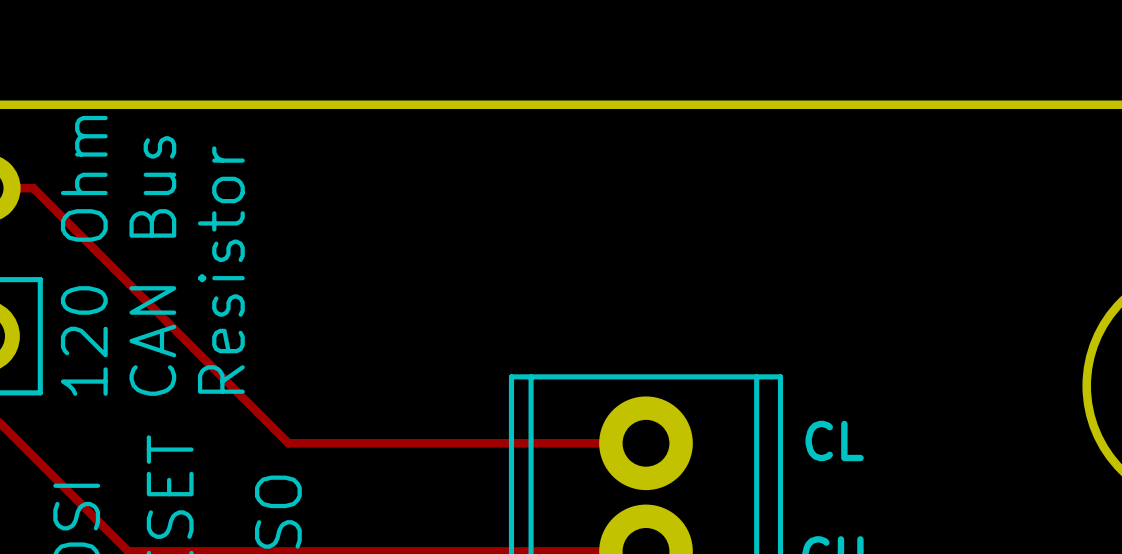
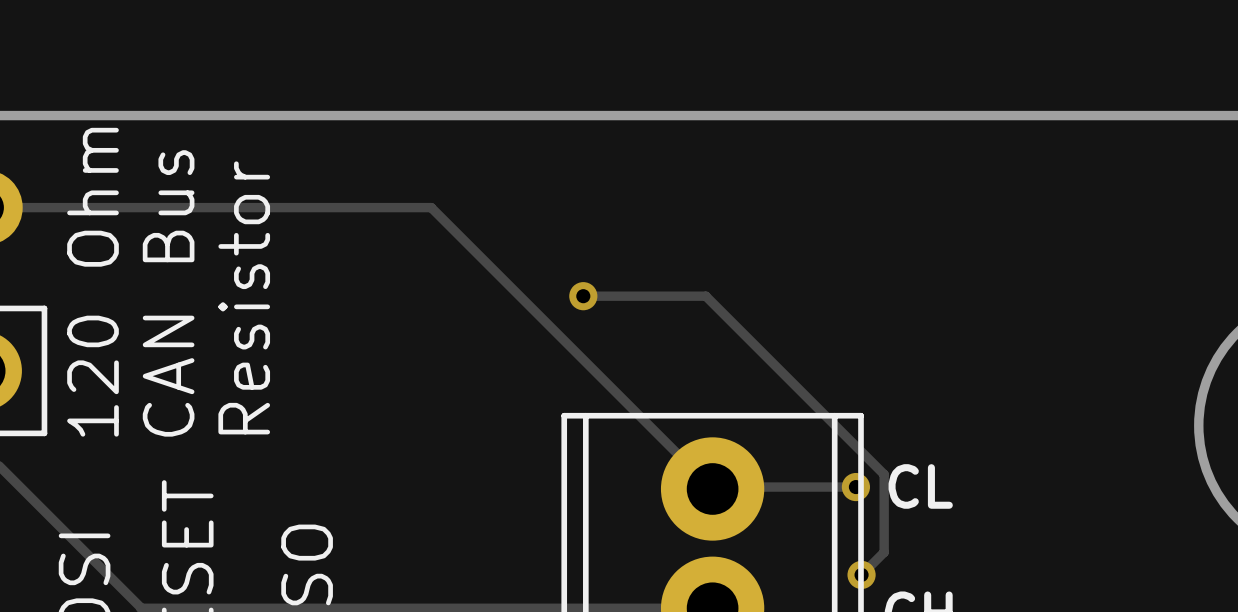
track: (33, 188) (288, 443) (645, 443) -> (36, 207) (431, 207) (712, 488) (714, 487) (855, 487)
track: none -> (583, 296) (705, 296) (884, 474) (884, 552) (861, 574)
via: none -> (583, 296)
via: none -> (855, 487)
via: none -> (861, 574)

